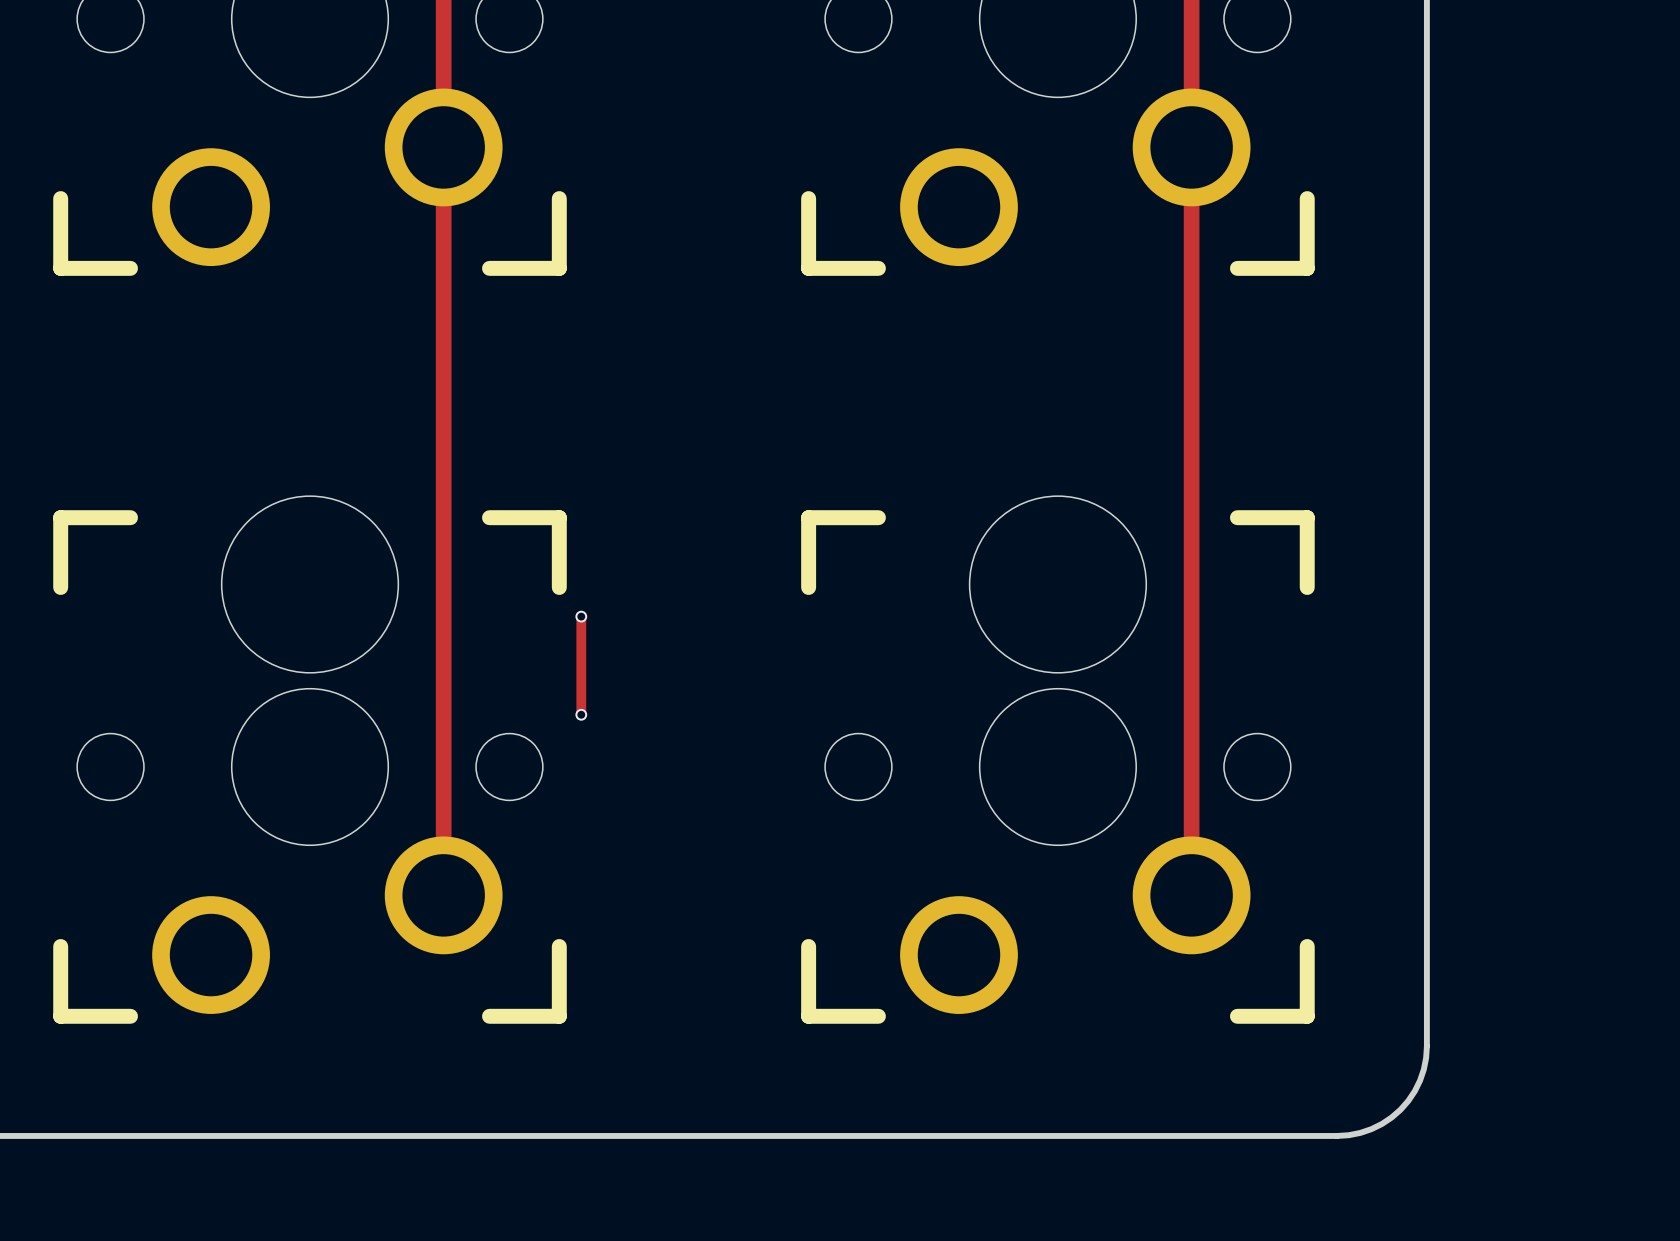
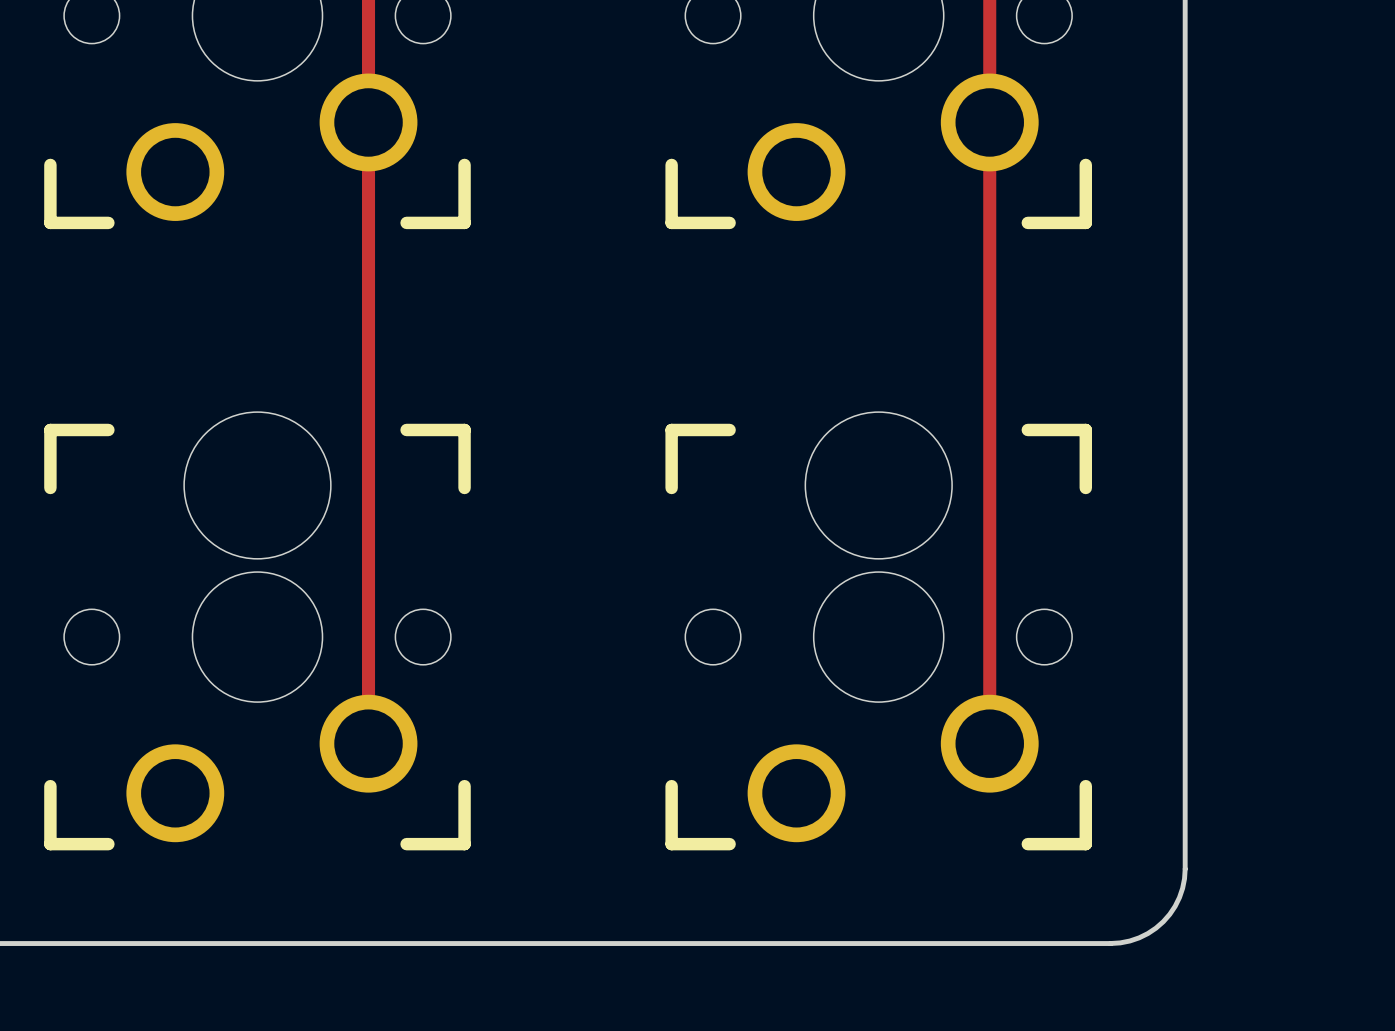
track: (581, 616) (581, 714) -> none
via: (581, 616) -> none
via: (581, 714) -> none

